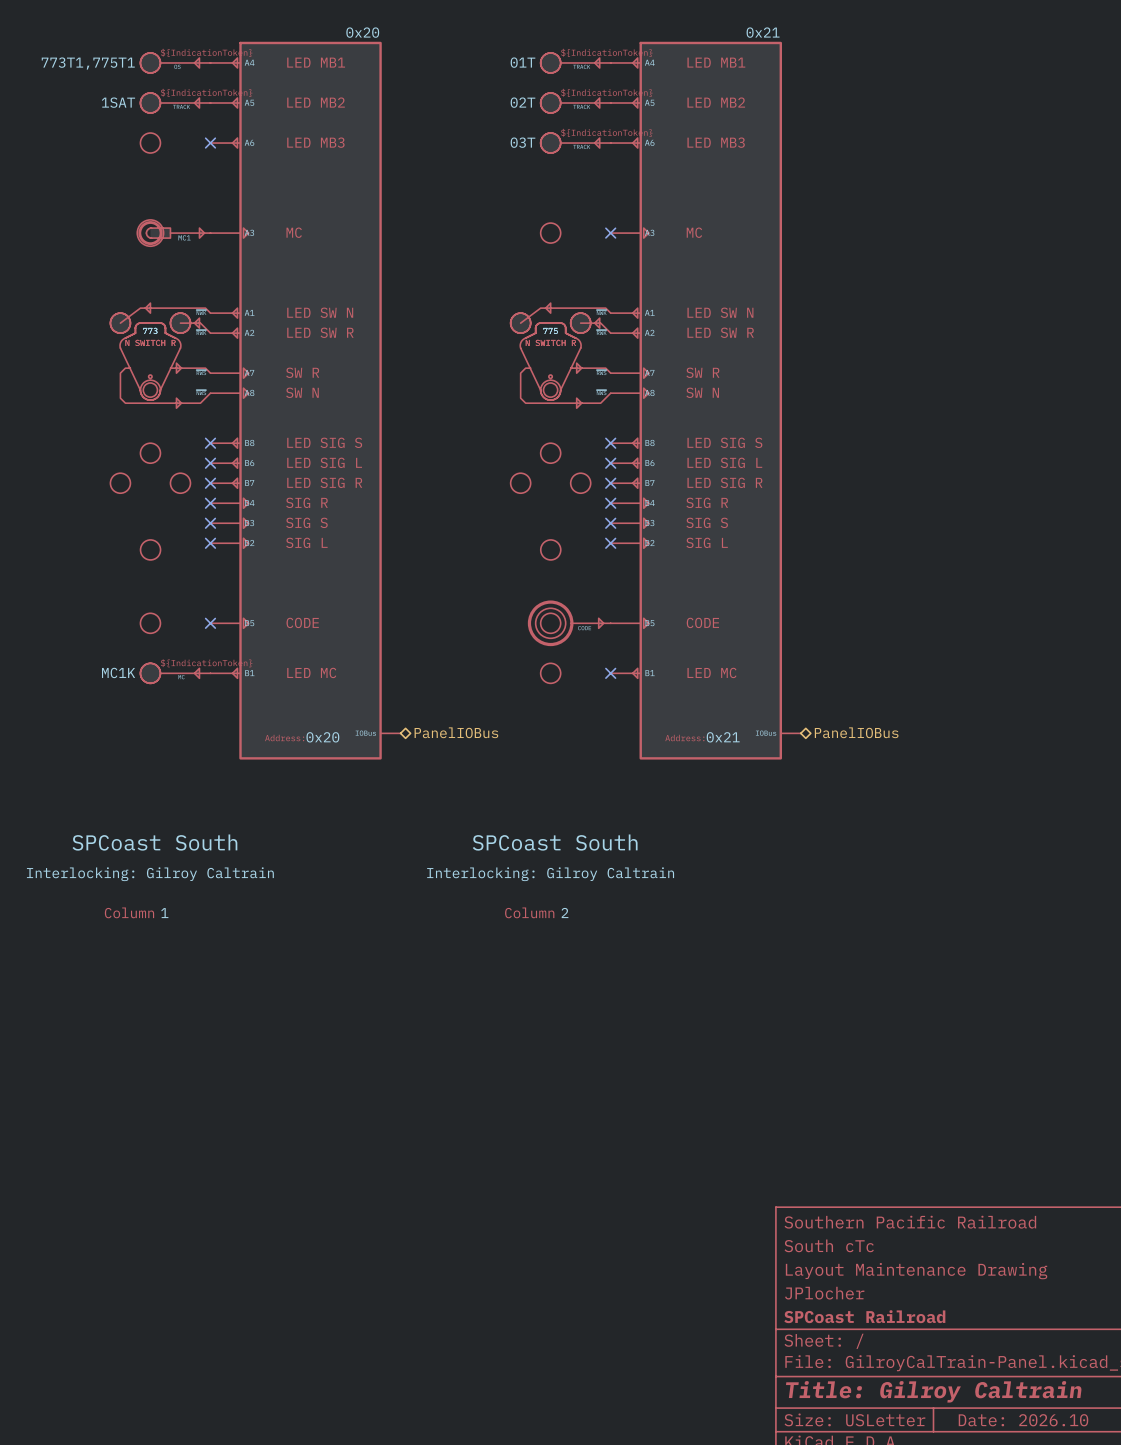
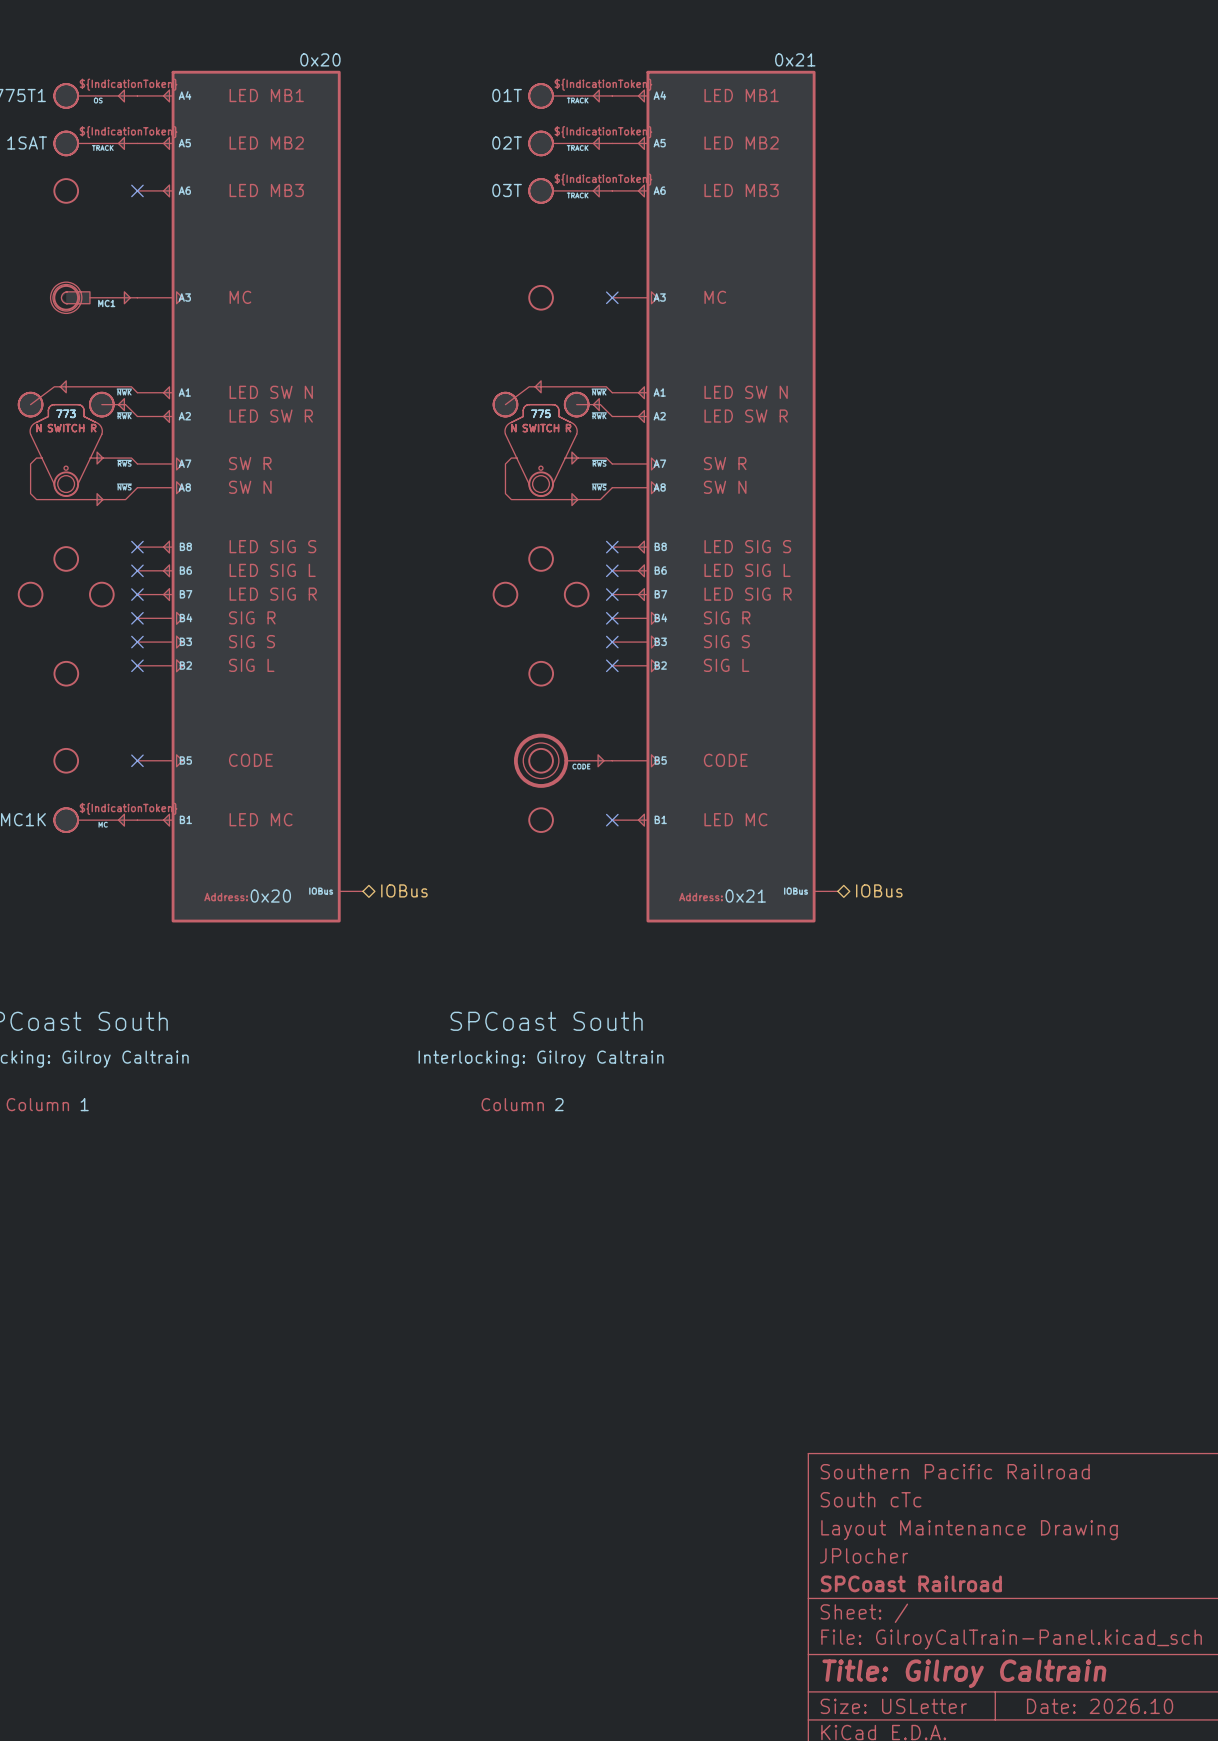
hierarchical label: PanelIOBus (456, 732) -> IOBus (404, 890)
hierarchical label: PanelIOBus (856, 732) -> IOBus (879, 890)

